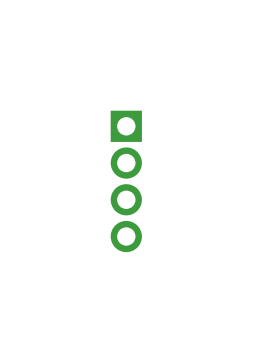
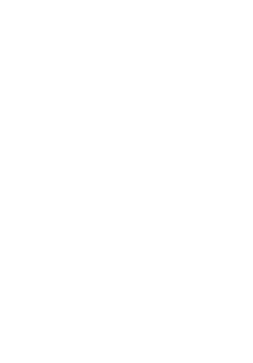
part: (126, 181) -> none

